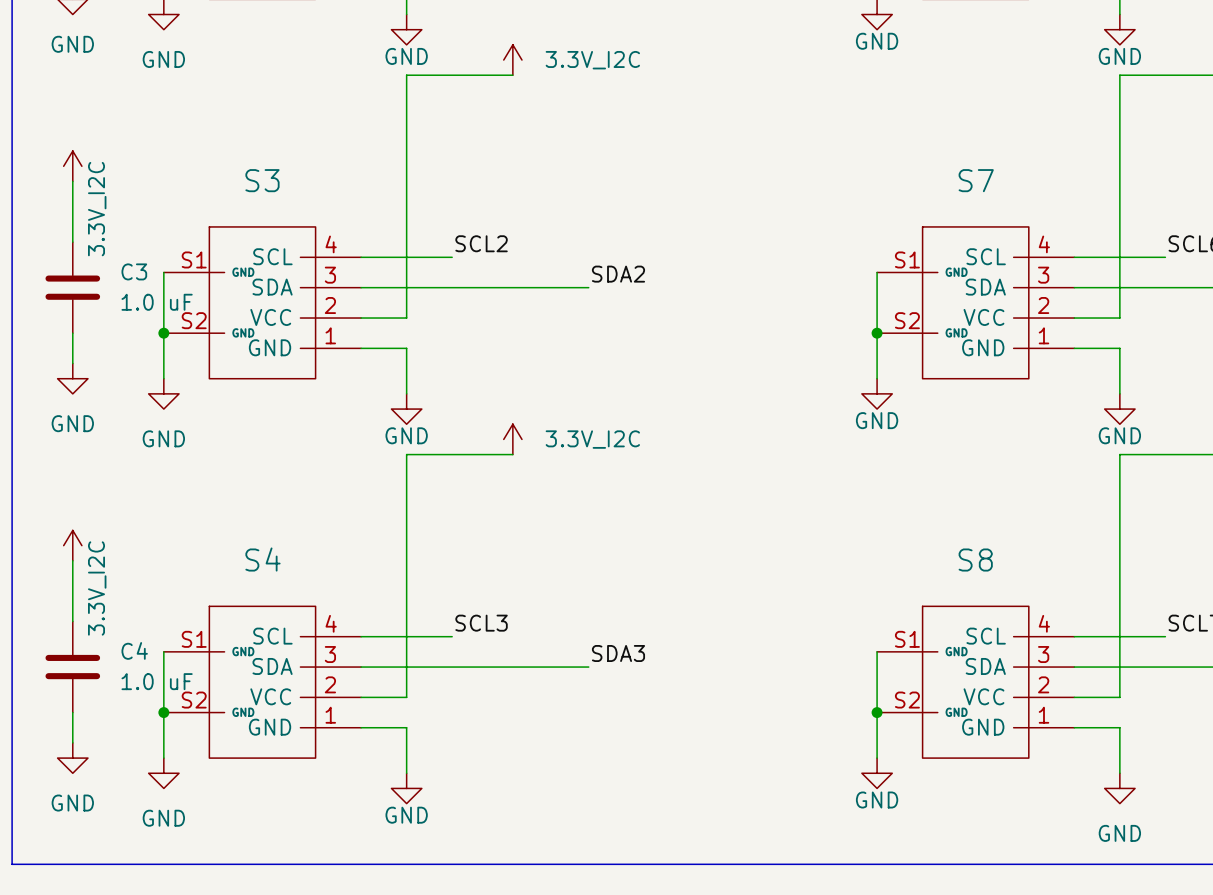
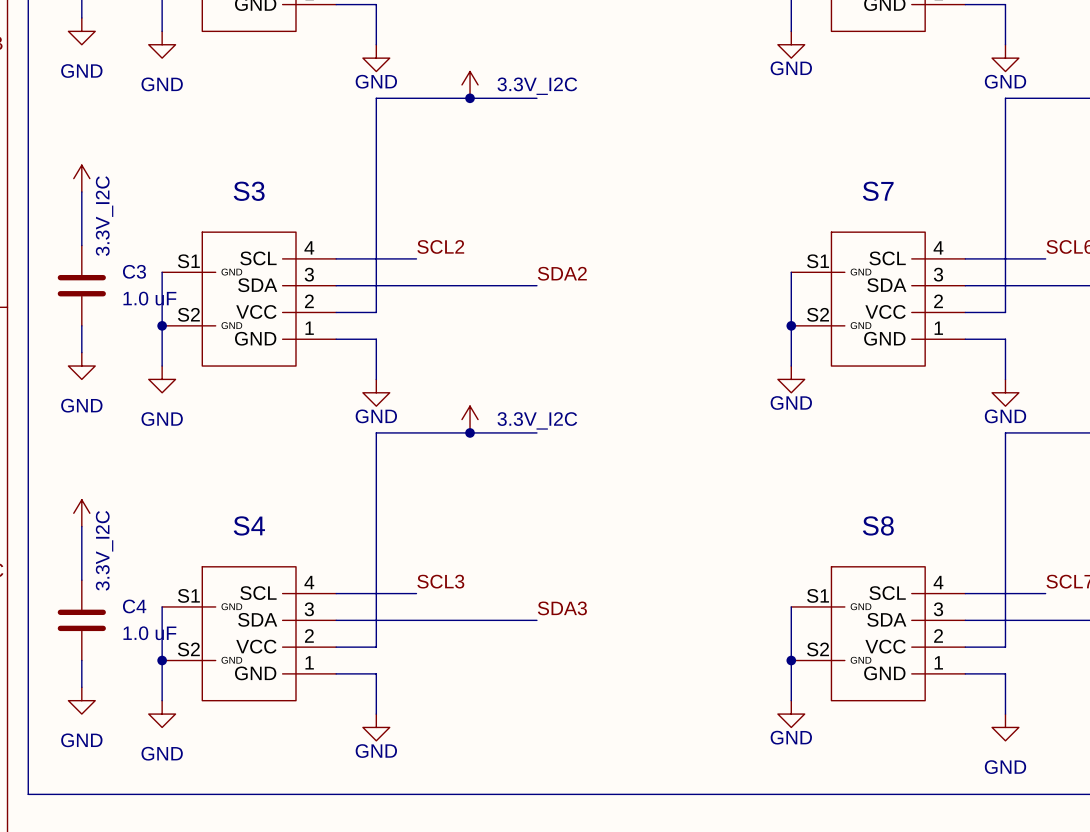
wire: none -> (470, 98) (536, 98)
junction: none -> (470, 98)
wire: none -> (470, 432) (536, 432)
junction: none -> (470, 432)

